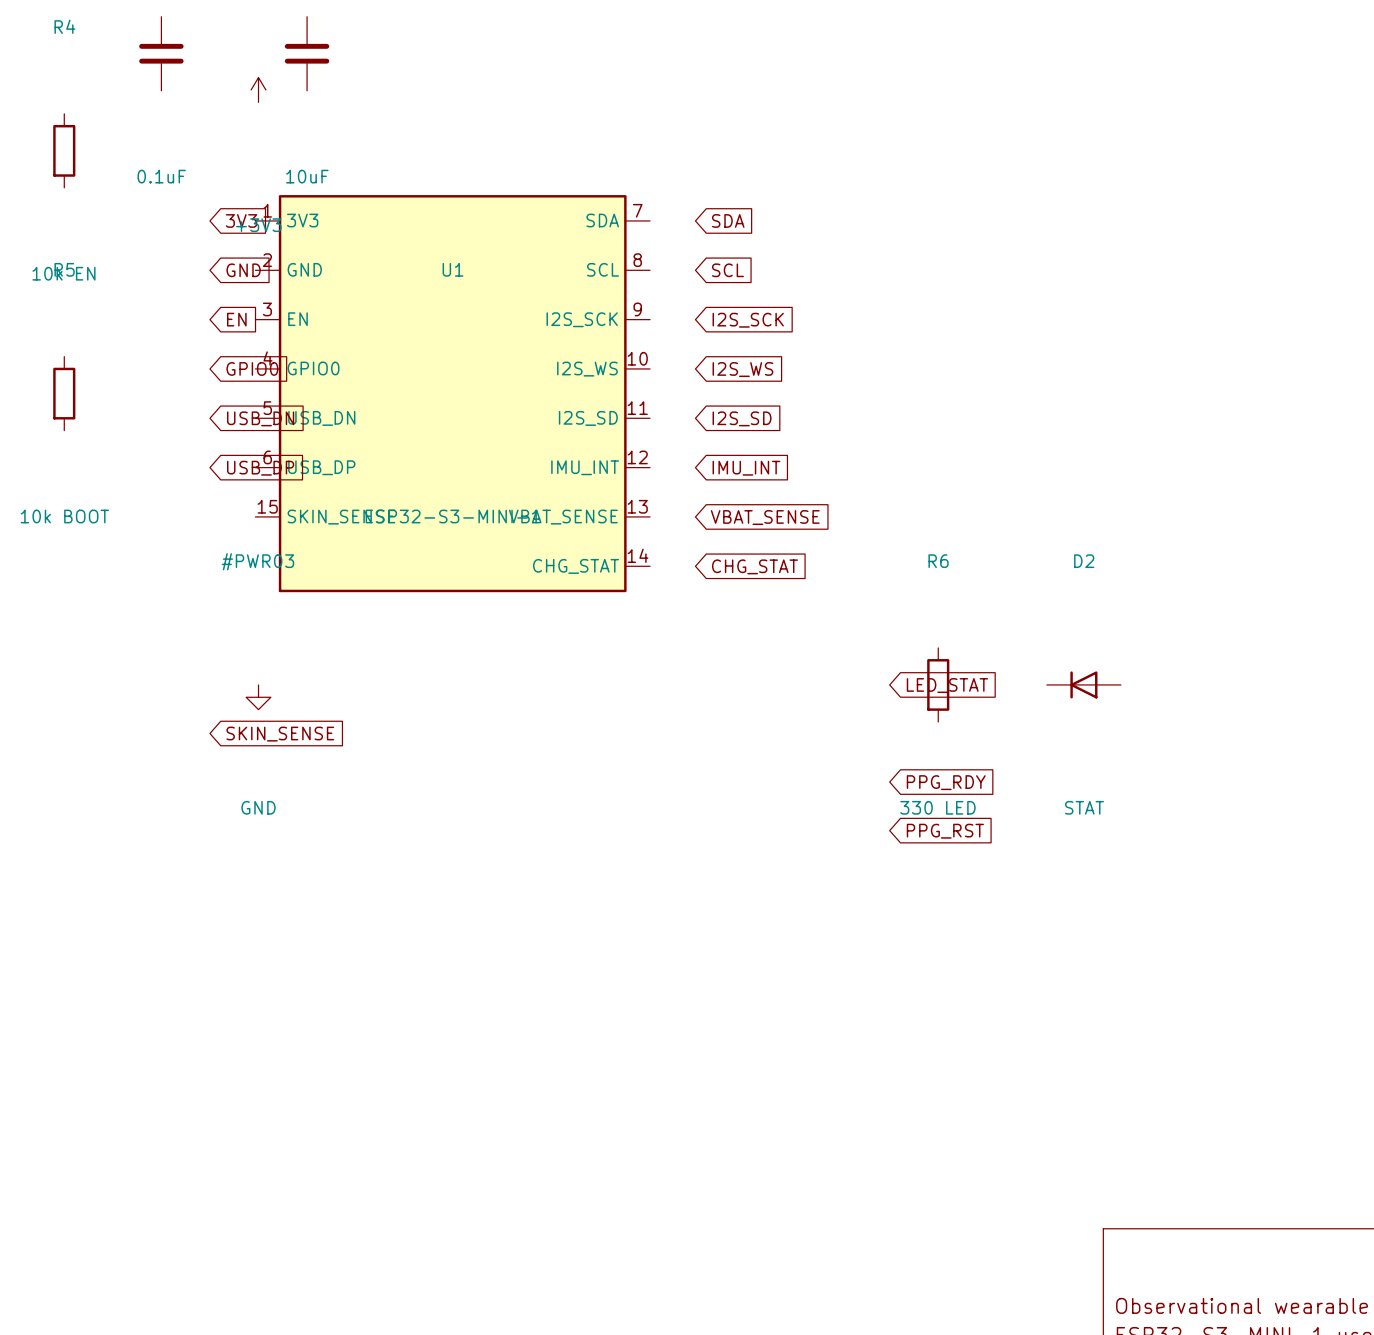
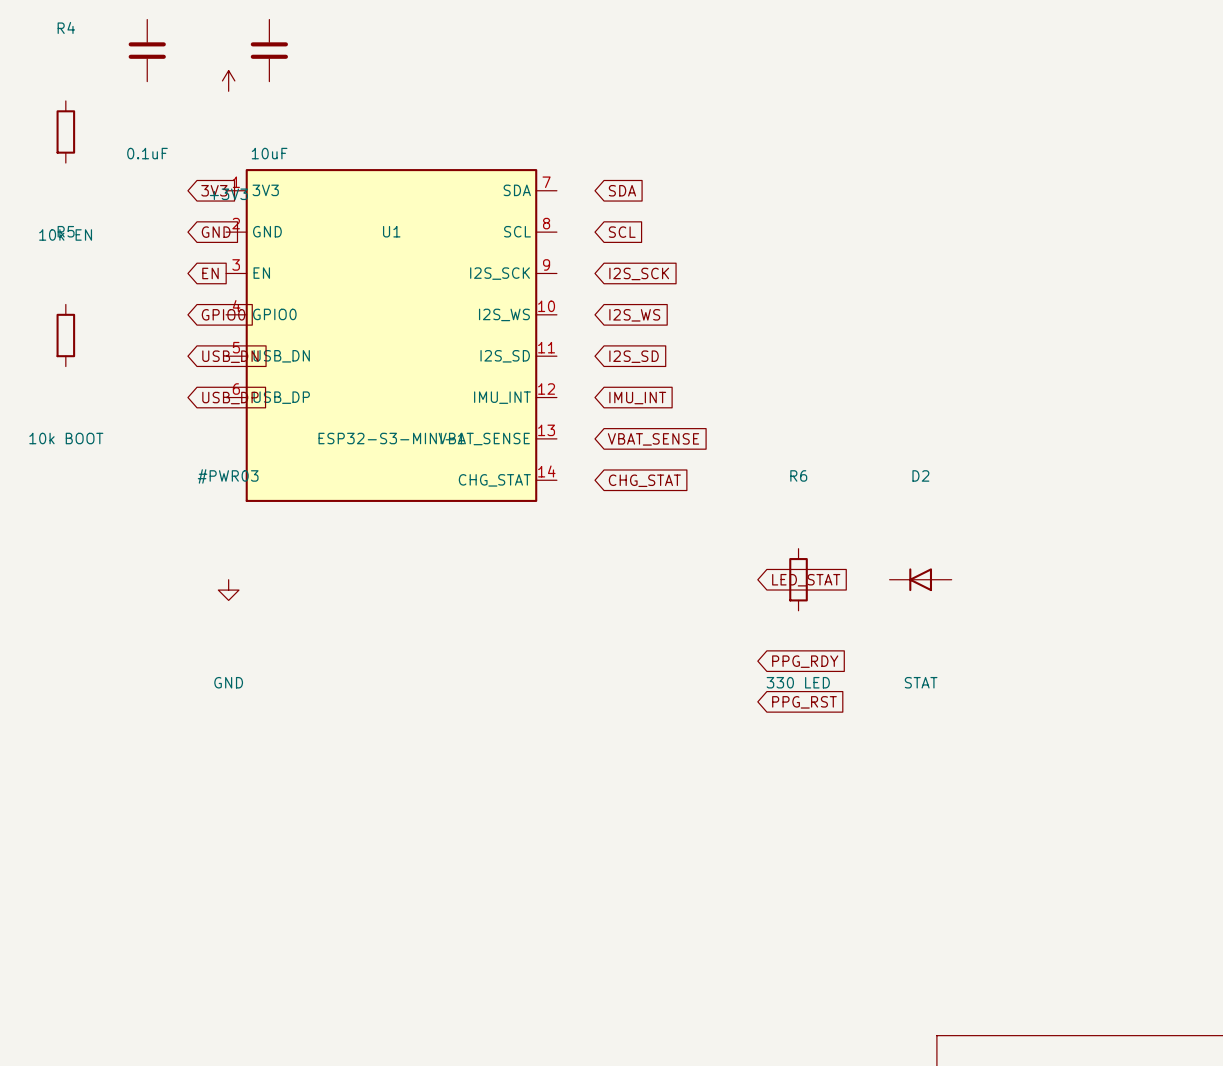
U1 symbol: [255, 195, 651, 593] -> [226, 169, 557, 502]
global label: SKIN_SENSE (280, 734) -> none

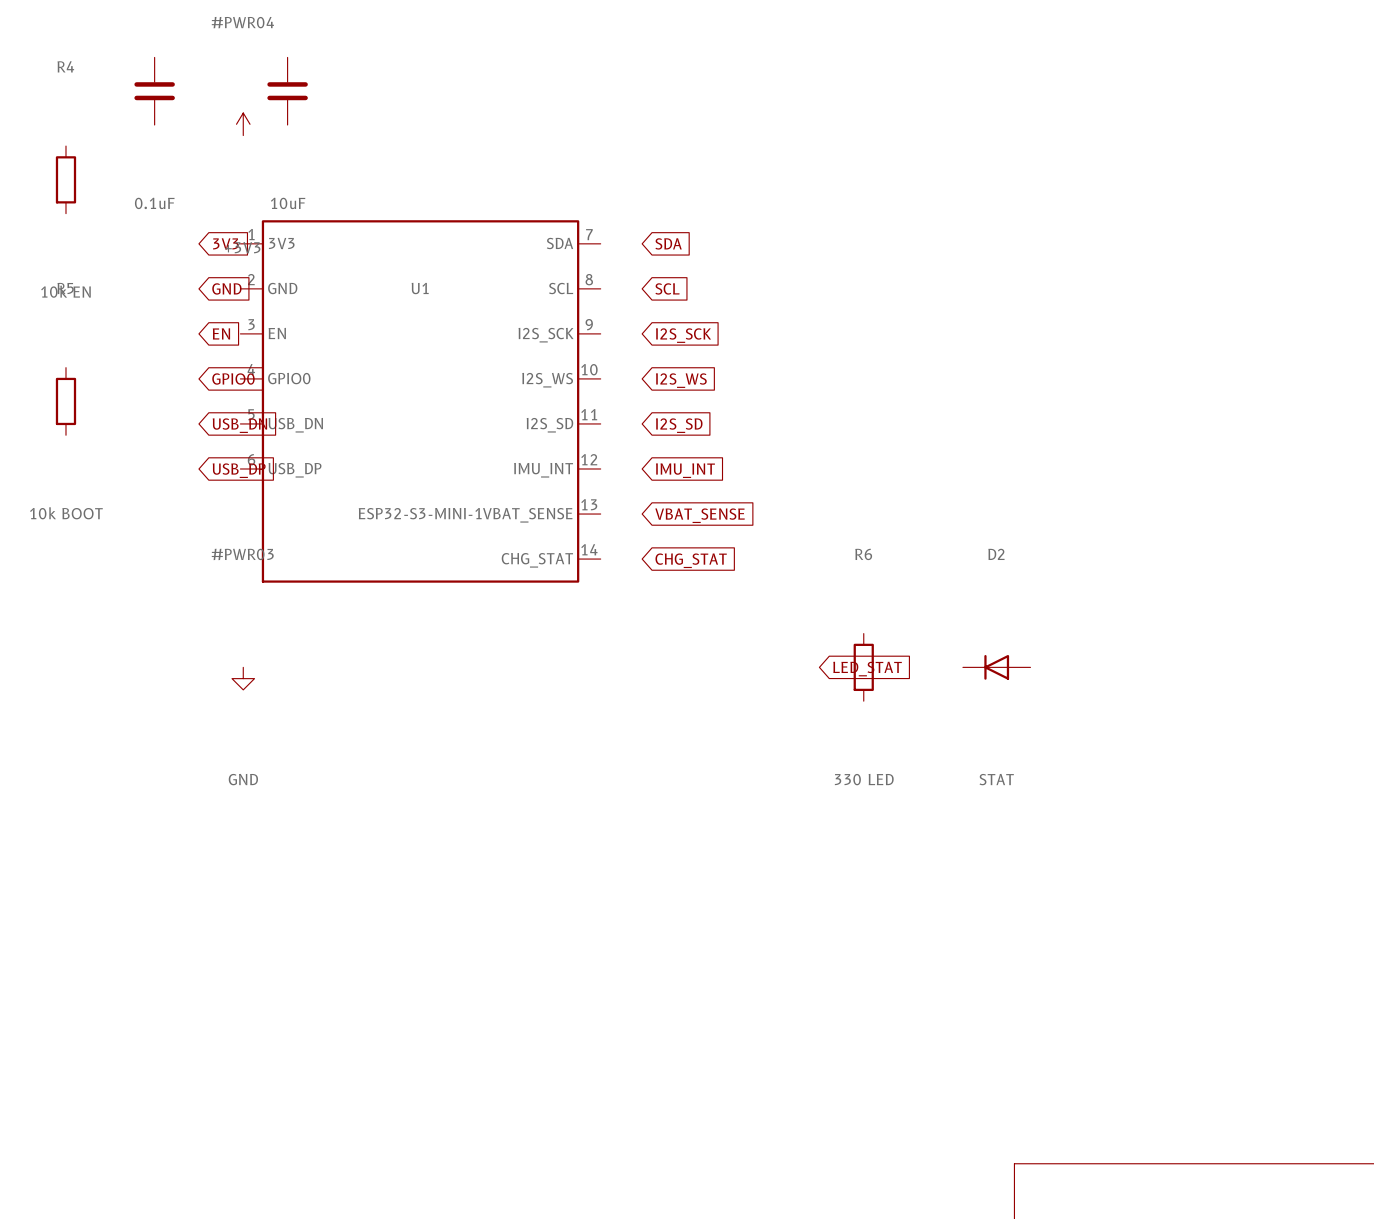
global label: PPG_RDY (805, 661) -> none
global label: PPG_RST (804, 702) -> none

